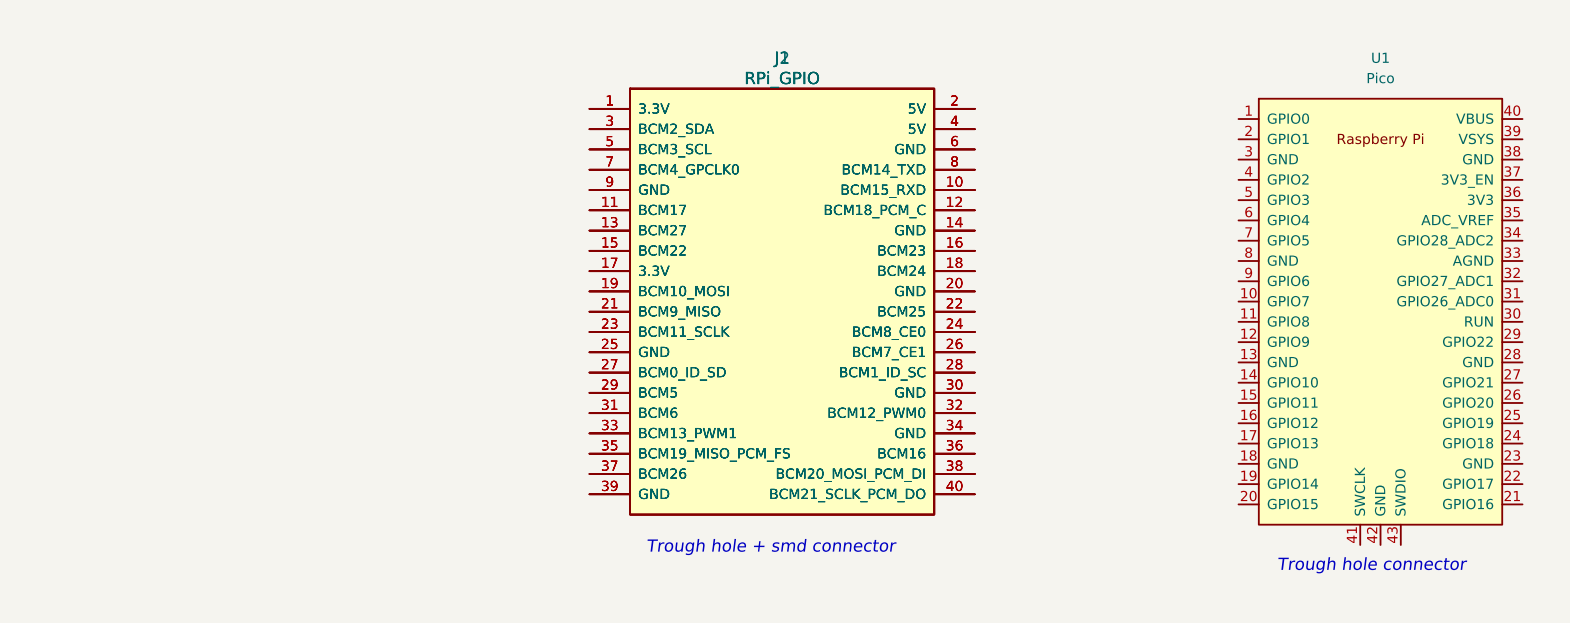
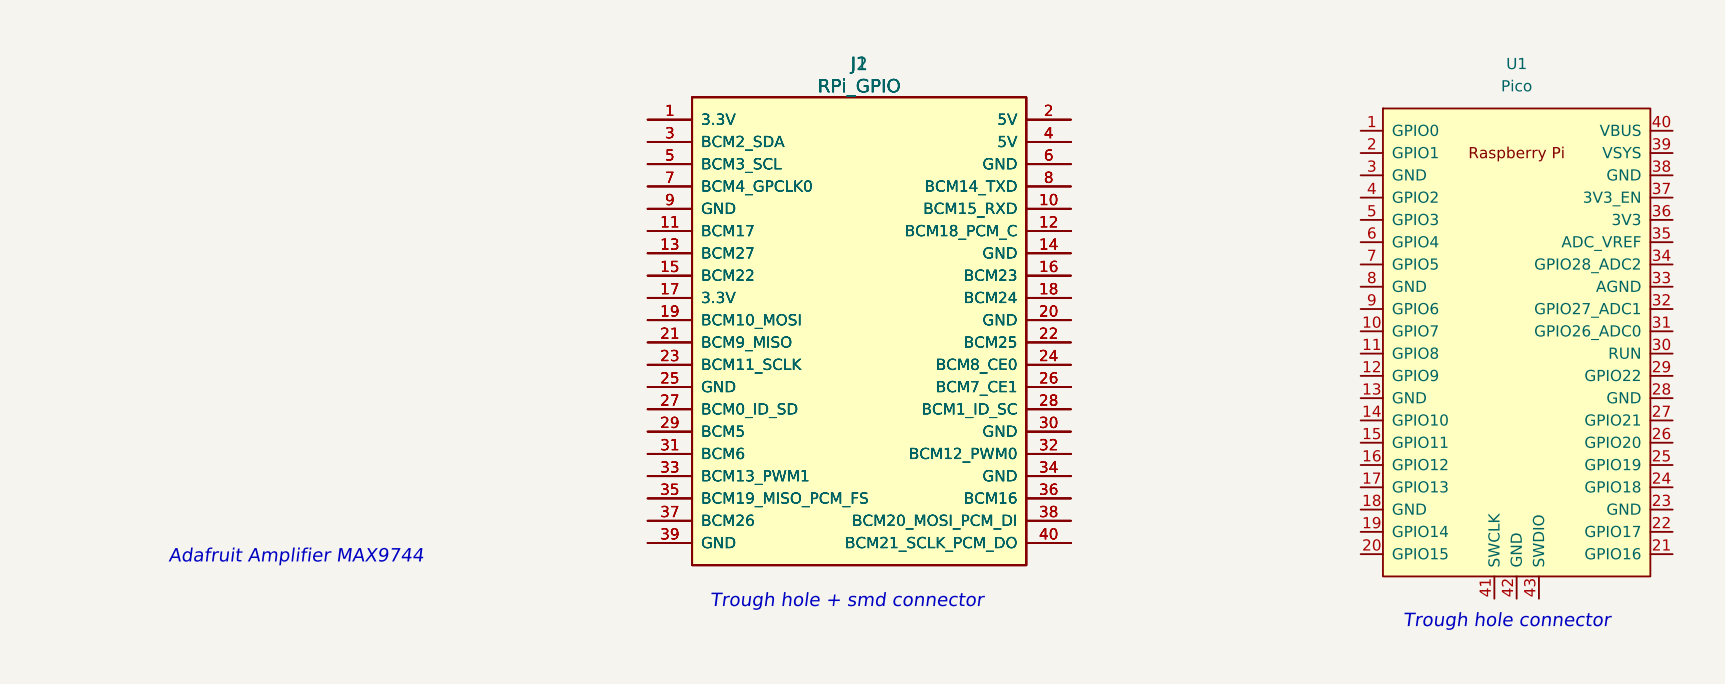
text: none -> Adafruit Amplifier MAX9744 (295, 556)

